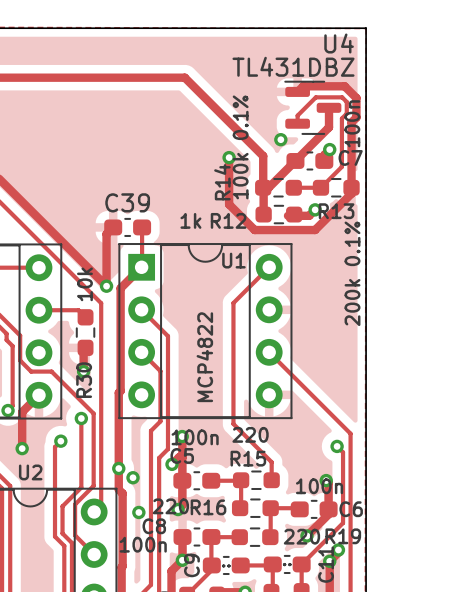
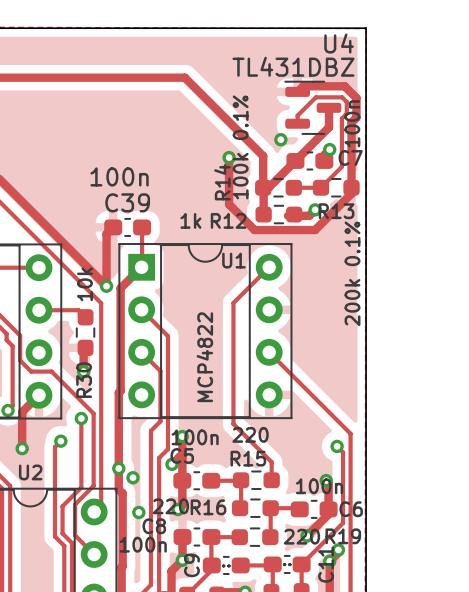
C39 value: none -> 100n (119, 176)

